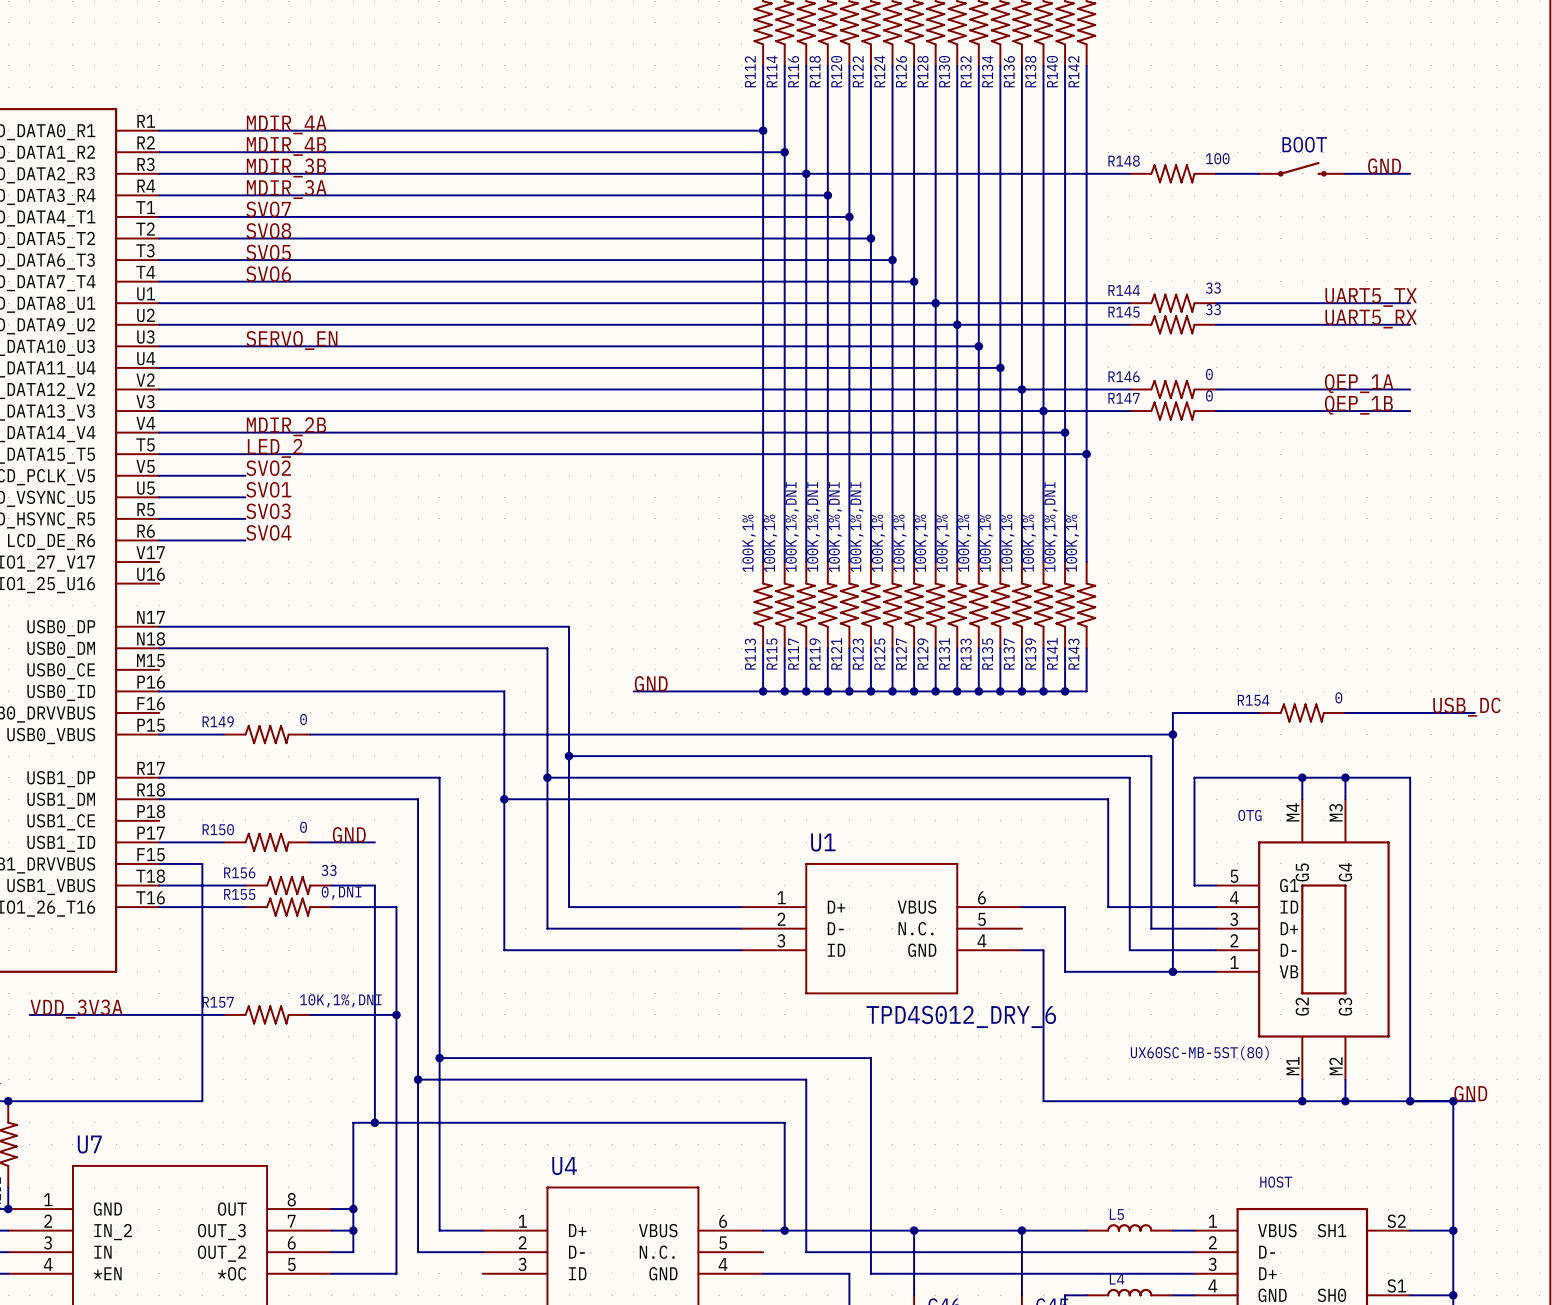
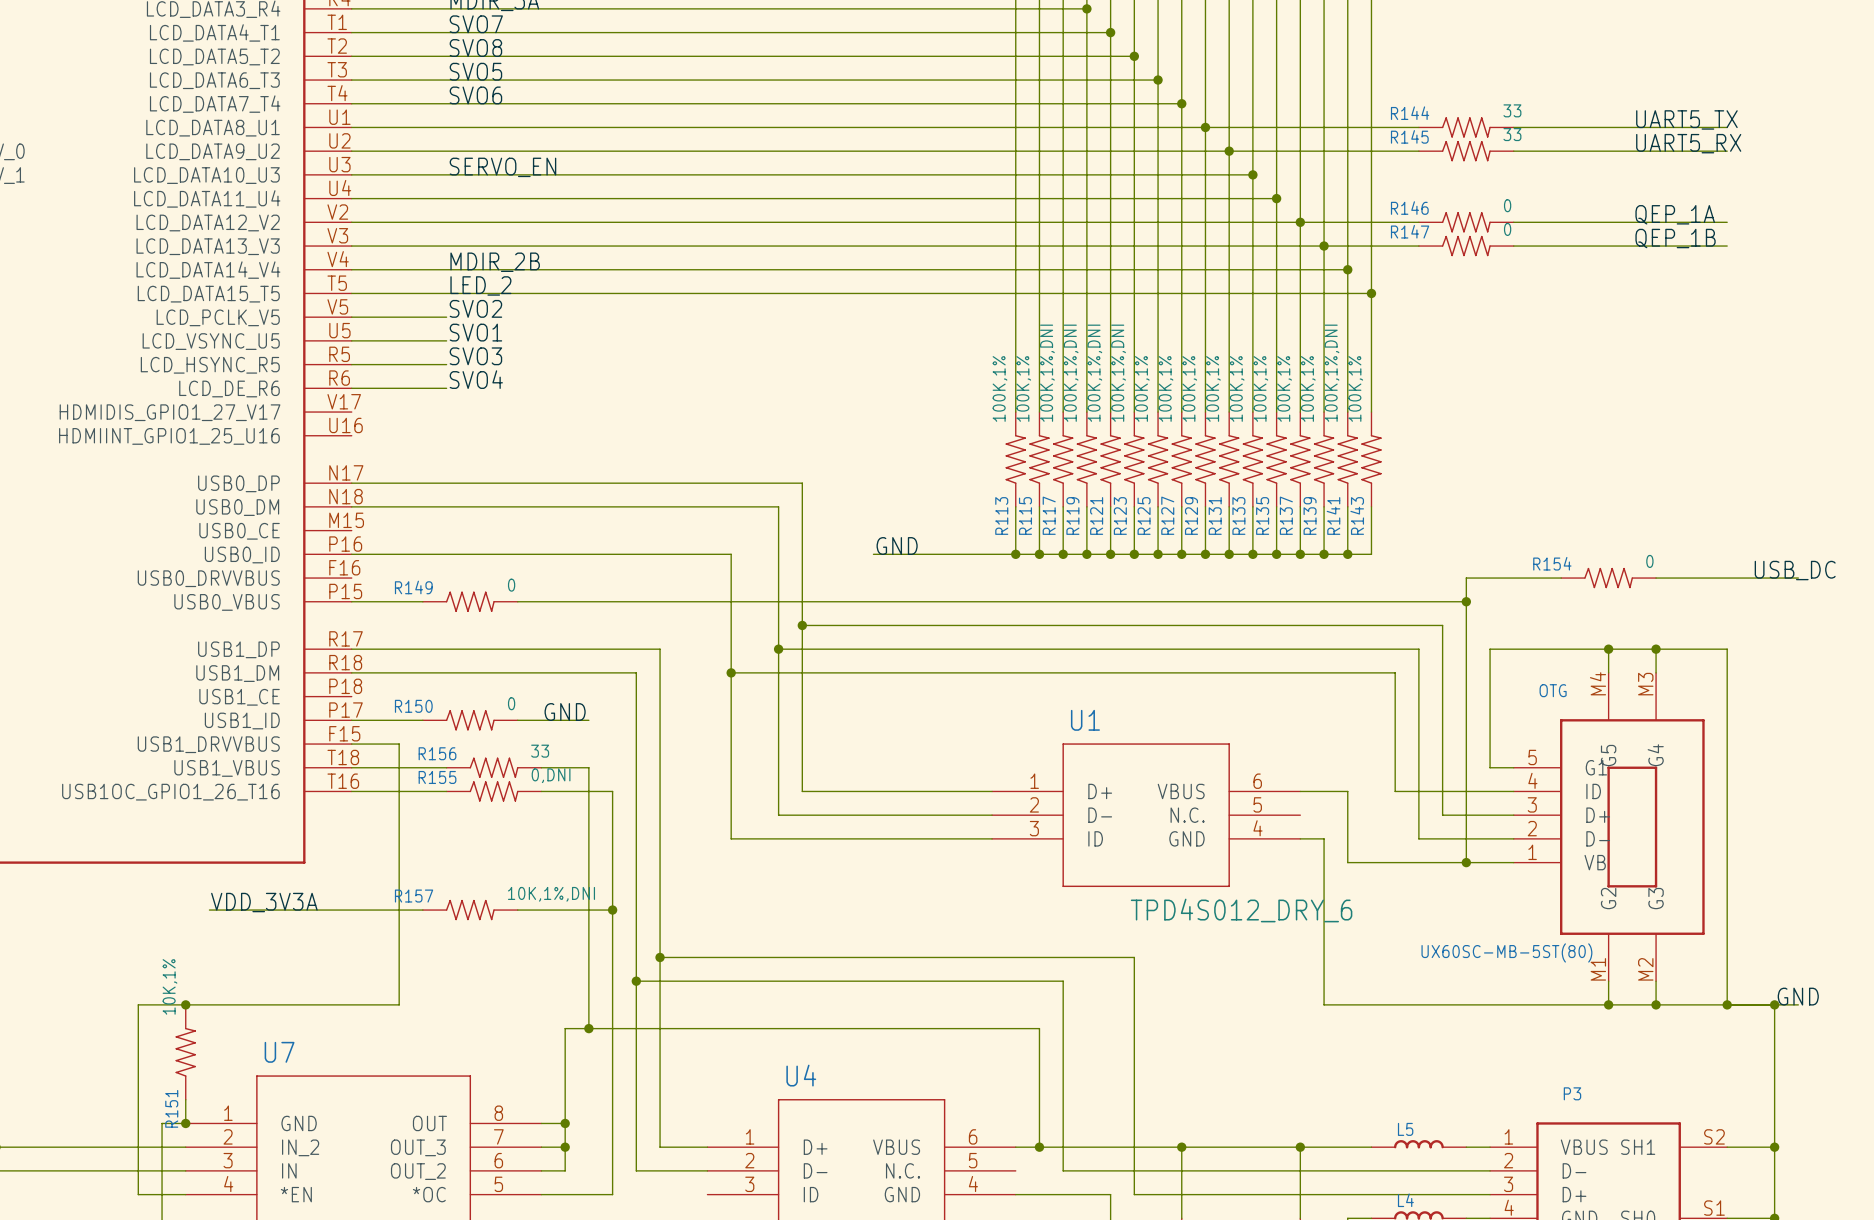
HOST text: none -> P3 (1572, 1093)
HOST name: HOST (1276, 1182) -> none

